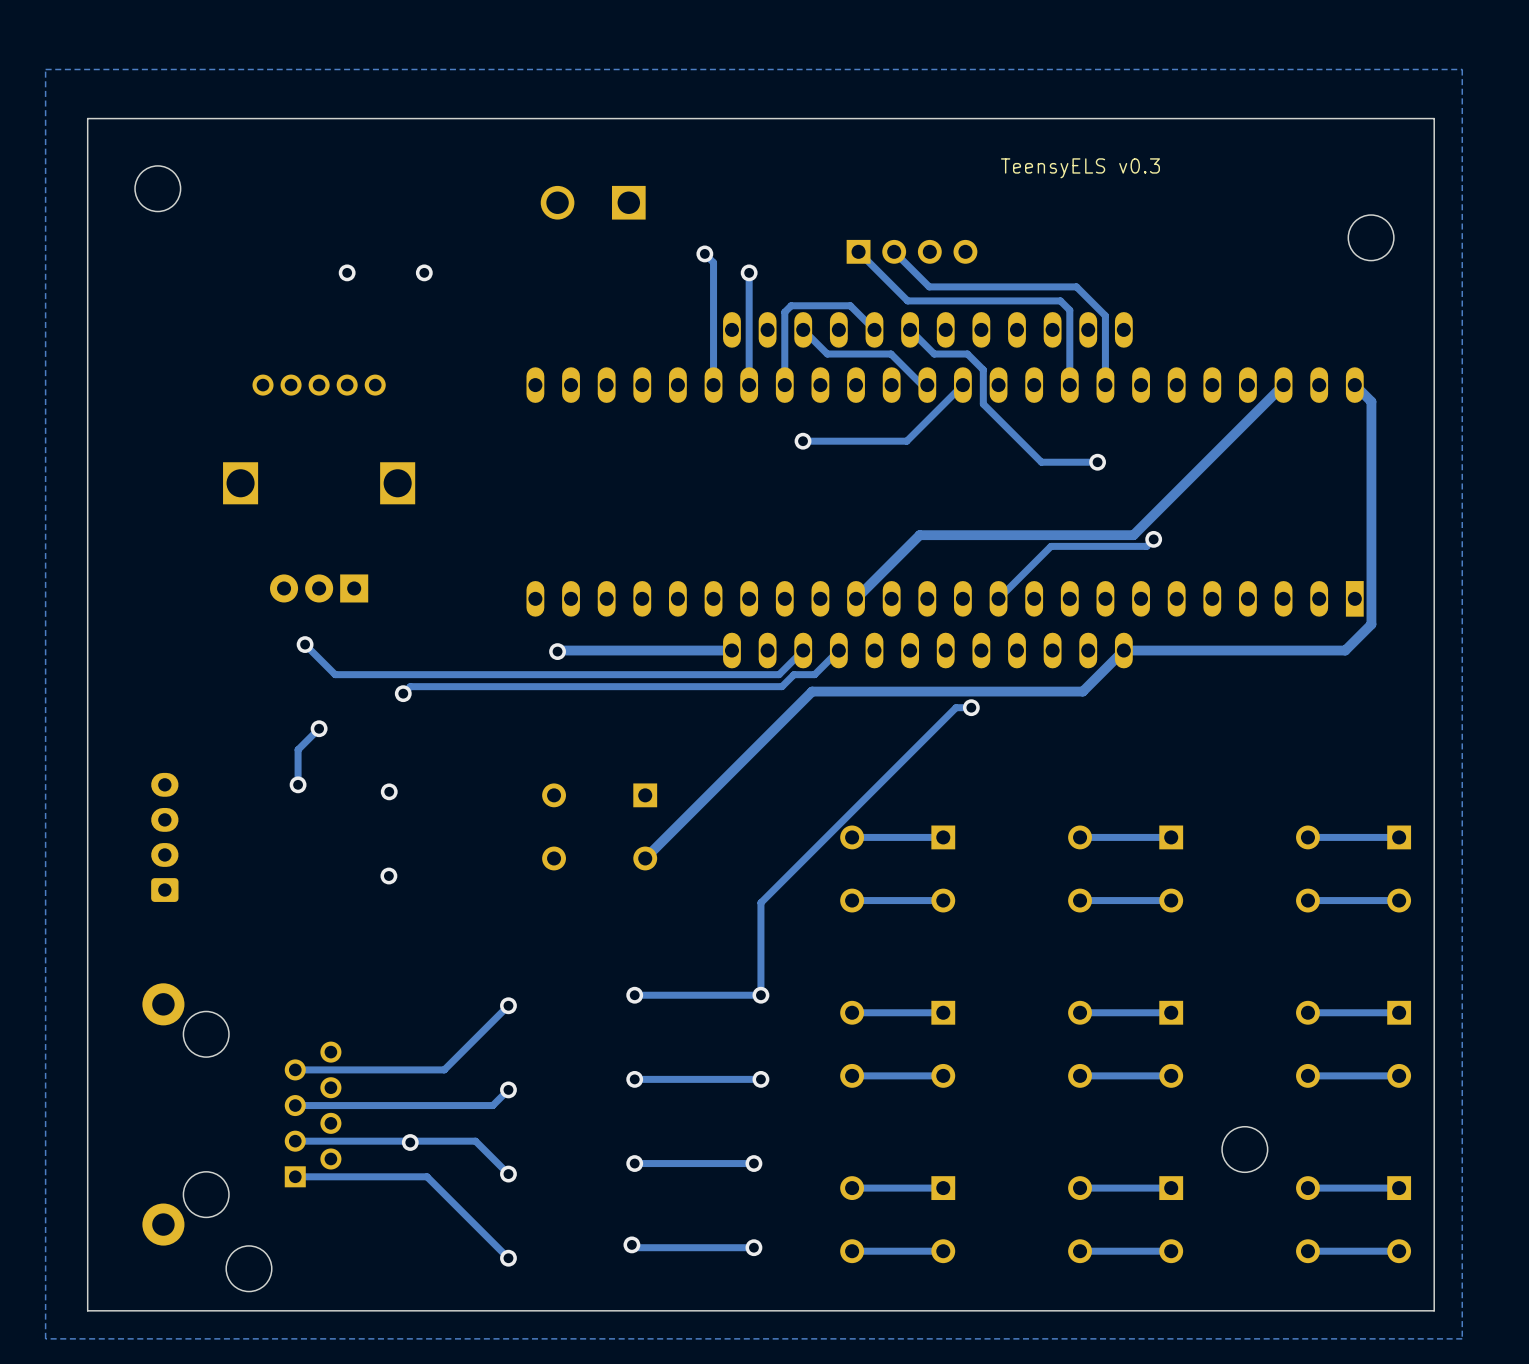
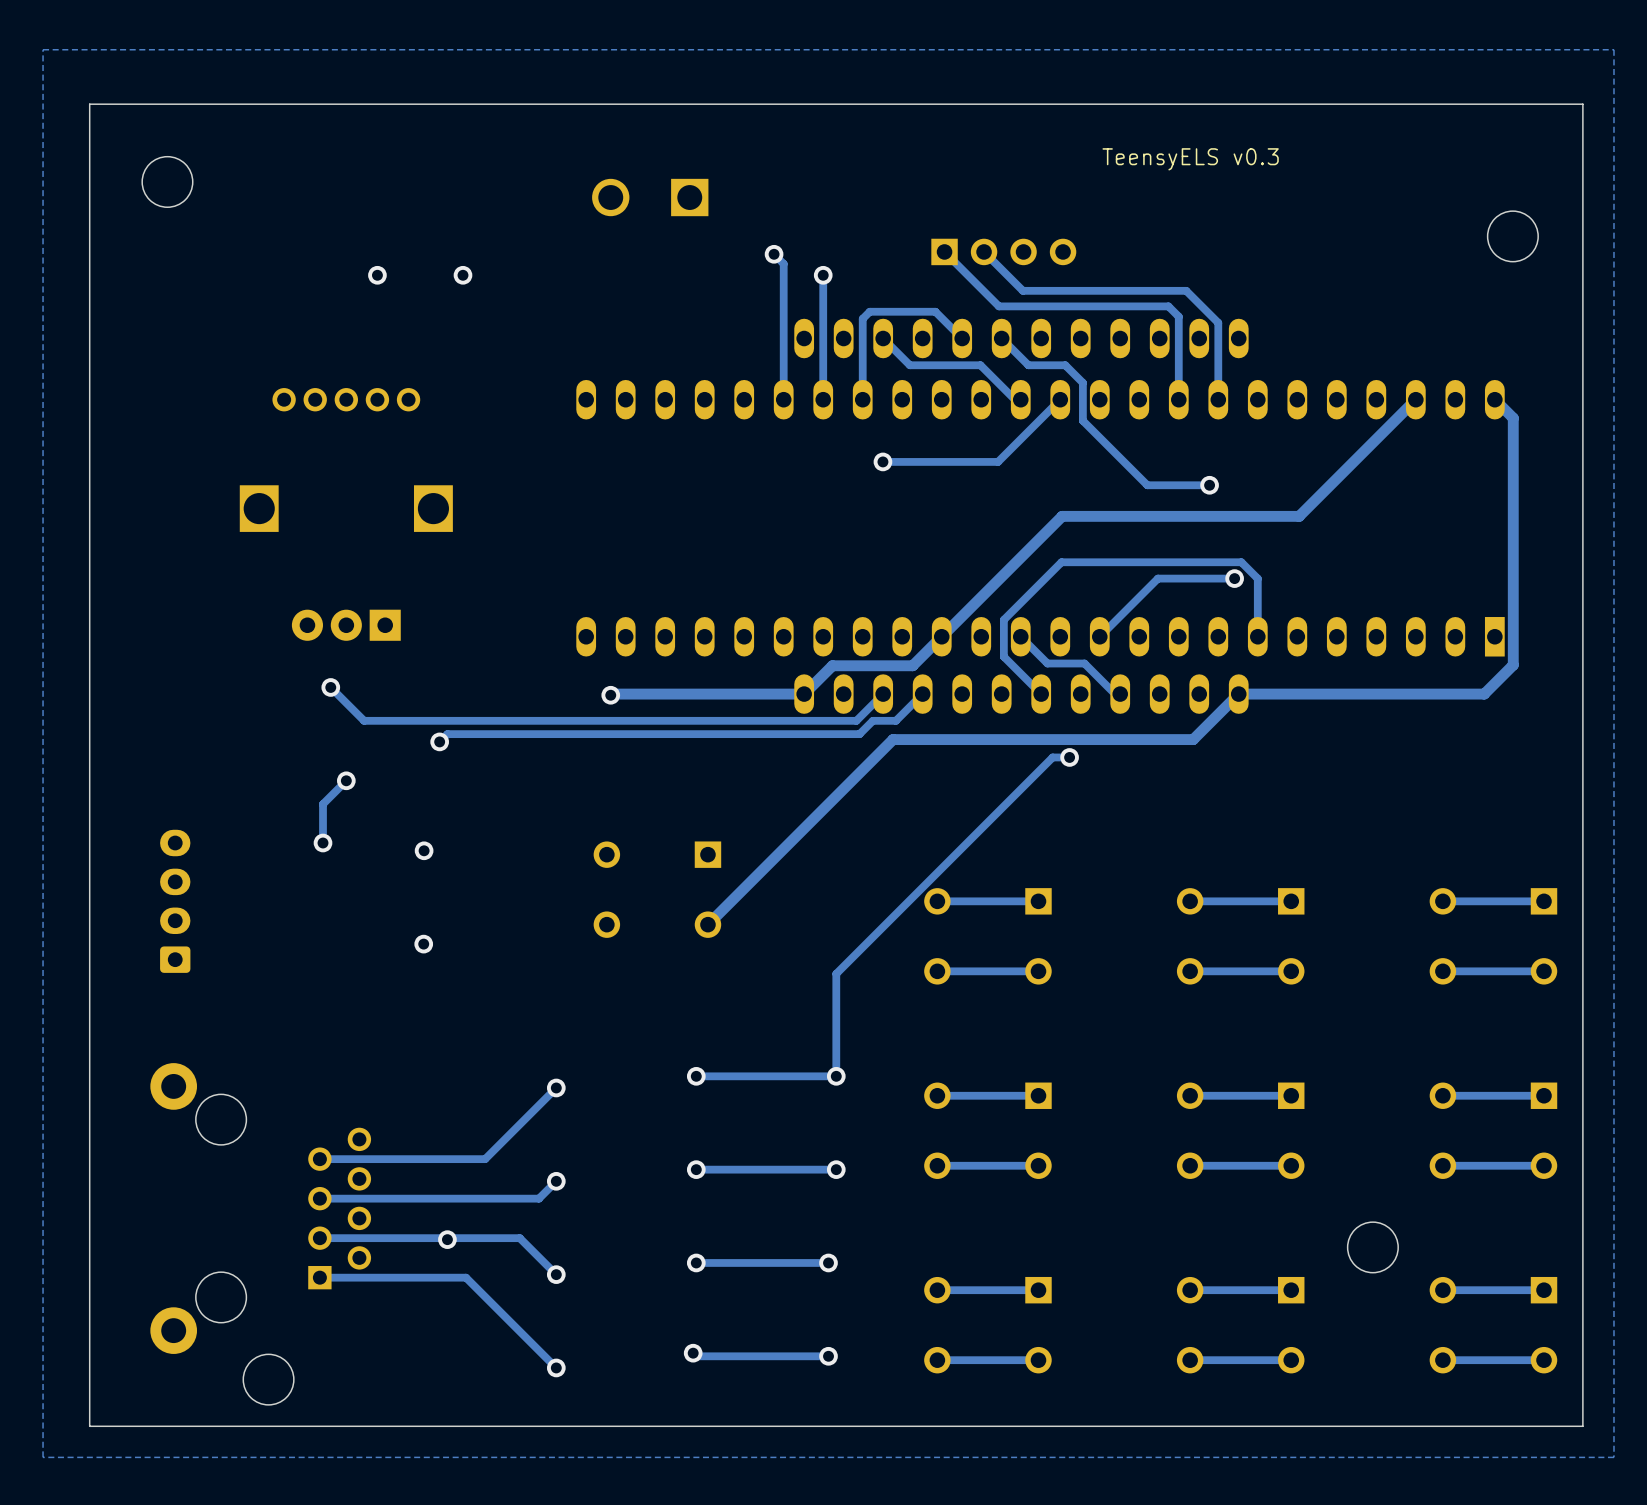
track: (1178, 490) (1133, 535) (919, 535) -> (1299, 516) (1062, 516) (1012, 566)
track: (1153, 539) (1146, 546) (1120, 546) -> none
via position: (1153, 539) -> (1234, 578)
track: none -> (941, 636) (912, 665) (832, 665) (804, 694)
track: none -> (1020, 636) (1047, 663) (1084, 663) (1115, 694) (1120, 694)
track: none -> (1257, 636) (1257, 578) (1241, 562) (1061, 562) (1003, 619) (1003, 656) (1041, 694)

